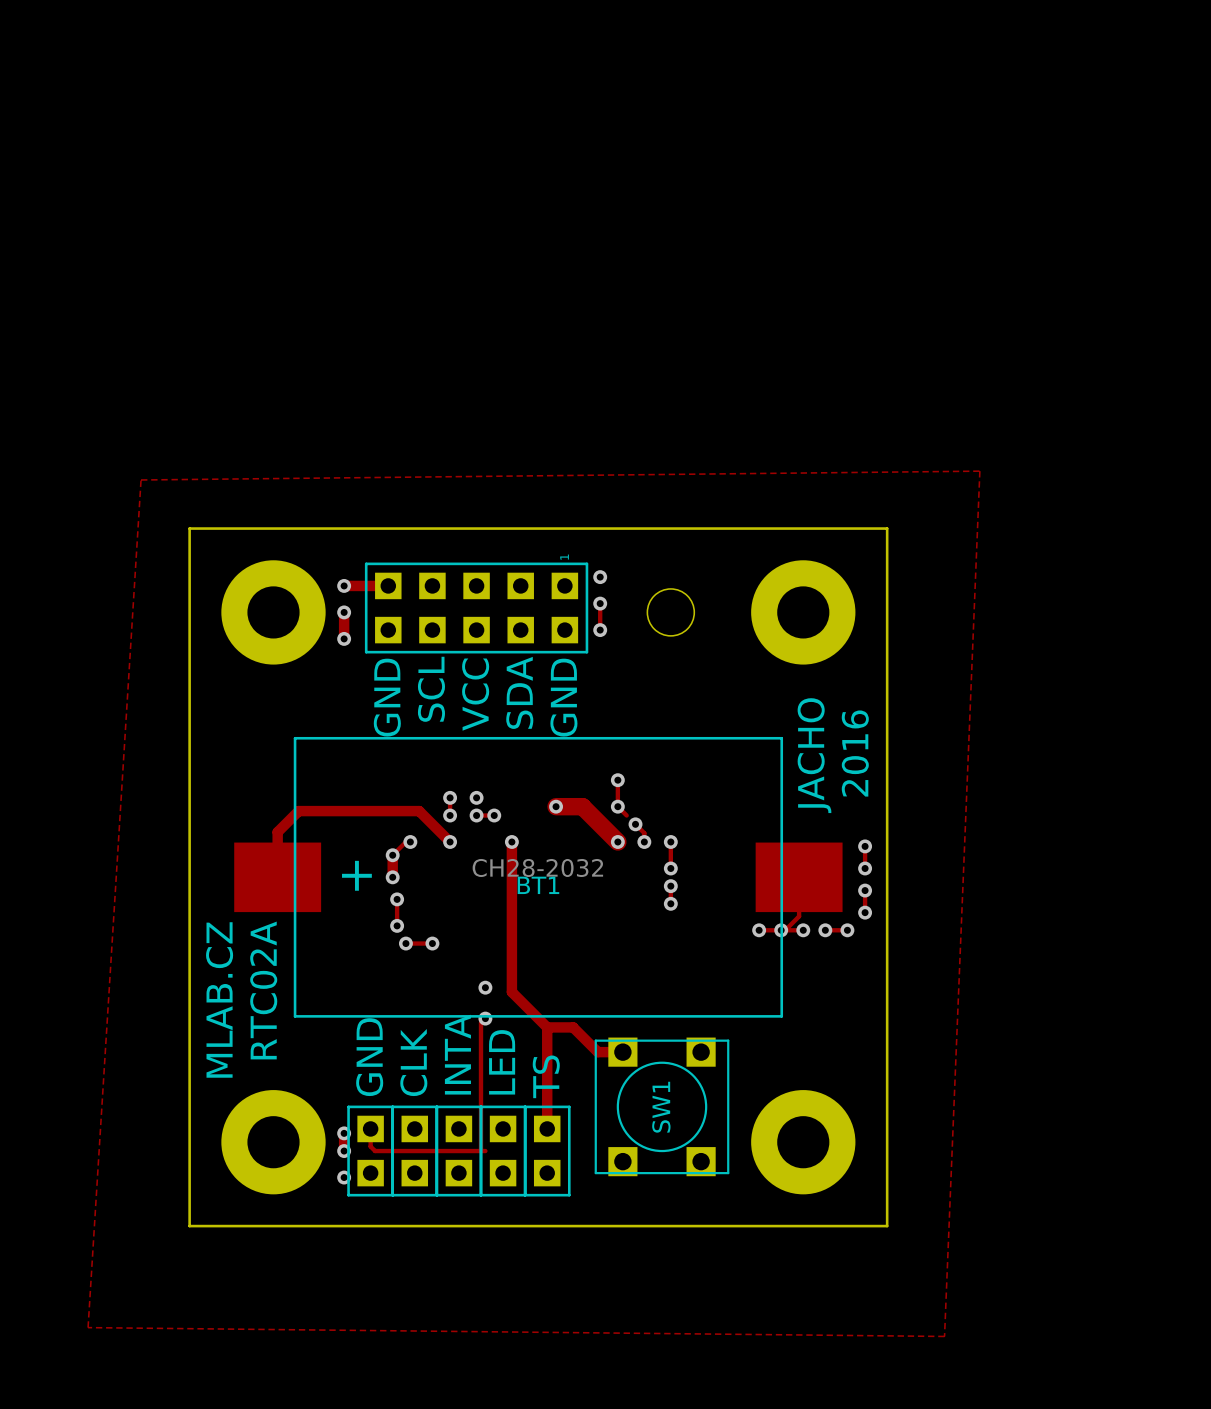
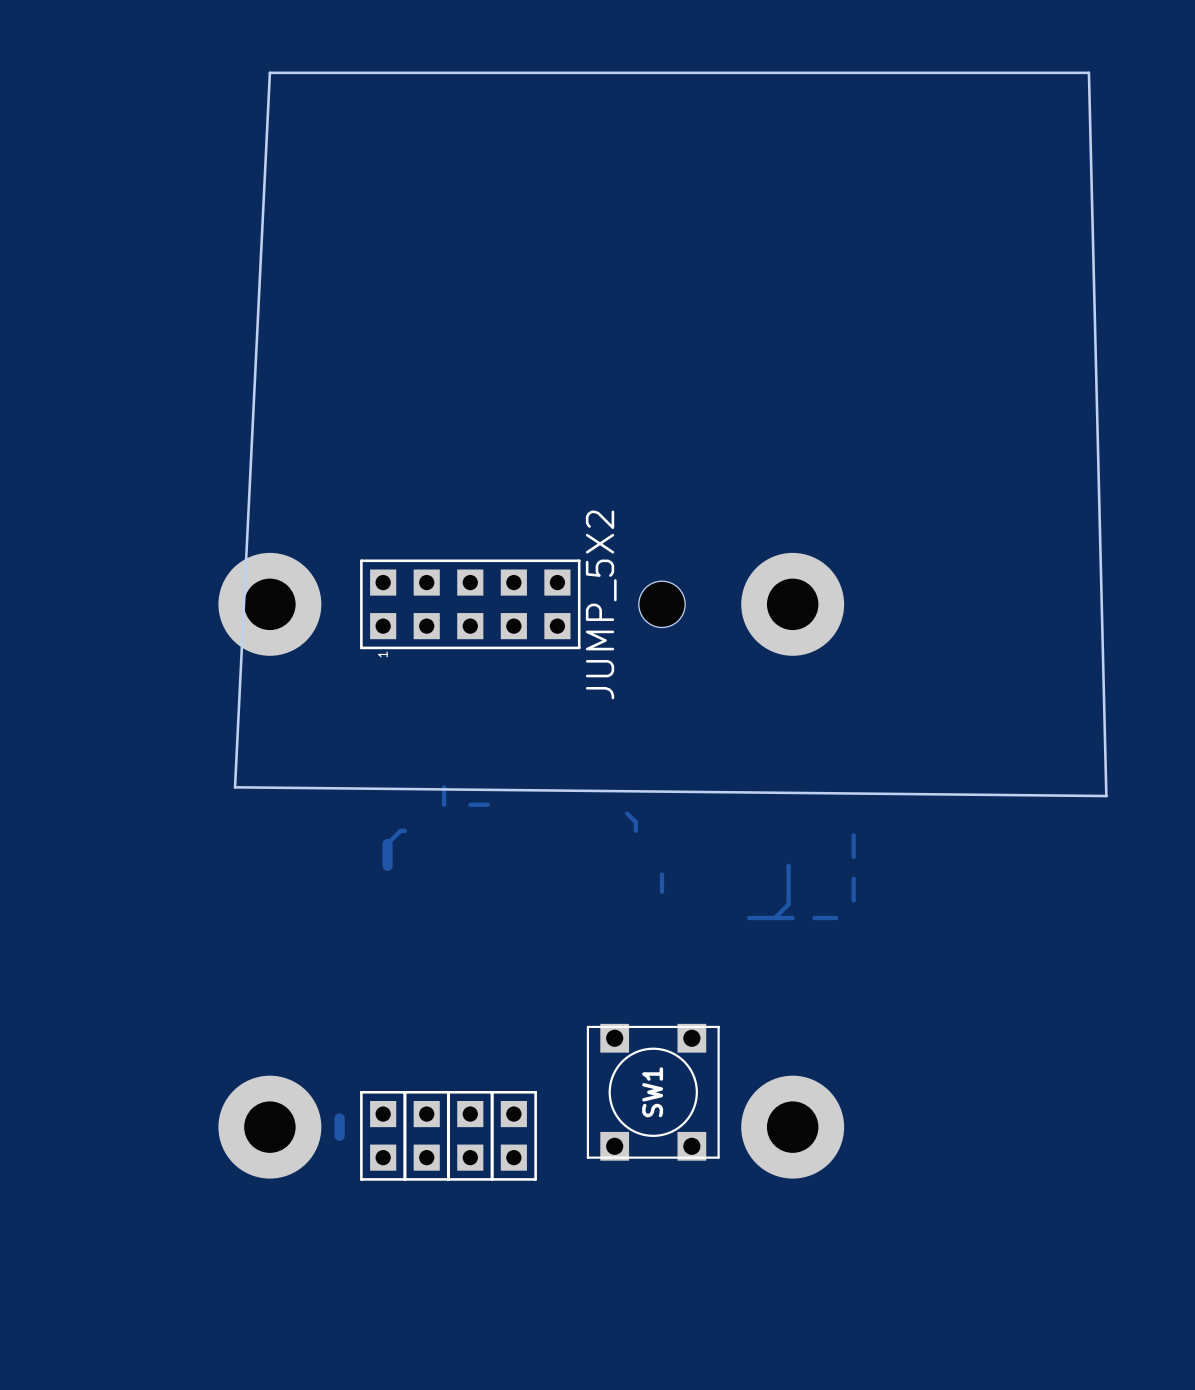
board edge: none -> (269, 72) (235, 787) (1106, 796) (1088, 72) (269, 72)
zone outline: (979, 471) (141, 479) (88, 1327) (944, 1336) (979, 471) -> none
board edge: (189, 528) (189, 1226) (887, 1226) (887, 528) (189, 528) -> none
via: (600, 577) -> none
track: (344, 585) (388, 585) -> none
via: (344, 585) -> none
track: (600, 603) (600, 630) -> none
via: (600, 603) -> none
part rotation: 0° (476, 608) -> 180° (470, 604)
track: (344, 612) (344, 638) -> none
via: (344, 612) -> none
part value: none -> JUMP_5X2 (601, 604)
via: (600, 630) -> none
via: (344, 638) -> none
text: SCL (431, 689) -> none
text: SDA (519, 692) -> none
text: VCC (475, 694) -> none
text: GND (387, 697) -> none
text: GND (563, 697) -> none
text: 2016 (855, 753) -> none
text: JACHO (814, 755) -> none
track: (617, 780) (617, 806) (626, 815) -> none
via: (617, 780) -> none
via: (450, 797) -> none
via: (476, 797) -> none
track: (556, 806) (582, 806) (617, 842) -> none
via: (556, 806) -> none
via: (617, 806) -> none
via: (450, 815) -> none
via: (476, 815) -> none
via: (494, 815) -> none
via: (635, 824) -> none
via: (410, 842) -> none
track: (450, 842) (419, 811) (298, 811) (277, 832) (277, 877) -> none
via: (450, 842) -> none
track: (511, 842) (511, 992) (547, 1027) -> none
via: (511, 842) -> none
via: (617, 842) -> none
via: (644, 842) -> none
track: (670, 842) (670, 868) -> none
via: (670, 842) -> none
via: (865, 846) -> none
via: (392, 855) -> none
via: (670, 868) -> none
via: (865, 868) -> none
via: (392, 877) -> none
BT1: CH28-2032 (538, 877) -> none
via: (670, 886) -> none
via: (865, 890) -> none
track: (397, 899) (397, 925) -> none
via: (397, 899) -> none
via: (670, 903) -> none
via: (865, 912) -> none
via: (397, 925) -> none
via: (759, 930) -> none
via: (781, 930) -> none
via: (803, 930) -> none
via: (825, 930) -> none
via: (847, 930) -> none
track: (405, 943) (432, 943) -> none
via: (405, 943) -> none
via: (432, 943) -> none
via: (485, 987) -> none
text: RTC02A (263, 990) -> none
text: MLAB.CZ (219, 999) -> none
track: (485, 1018) (480, 1023) (480, 1151) -> none
via: (485, 1018) -> none
track: (547, 1027) (573, 1027) (597, 1052) (622, 1052) -> none
track: (547, 1027) (547, 1128) -> none
text: INTA (457, 1054) -> none
text: GND (369, 1057) -> none
text: CLK (413, 1062) -> none
text: LED (502, 1062) -> none
text: TS (546, 1076) -> none
track: (370, 1128) (370, 1146) (375, 1151) (485, 1151) -> none
via: (344, 1133) -> none
via: (344, 1151) -> none
part: (370, 1151) -> none
part: none -> (383, 1135)
part: (414, 1151) -> none
part: none -> (426, 1135)
part: (458, 1151) -> none
part: none -> (470, 1135)
part: (503, 1151) -> none
part: none -> (513, 1135)
part: (547, 1151) -> none
via: (344, 1177) -> none

